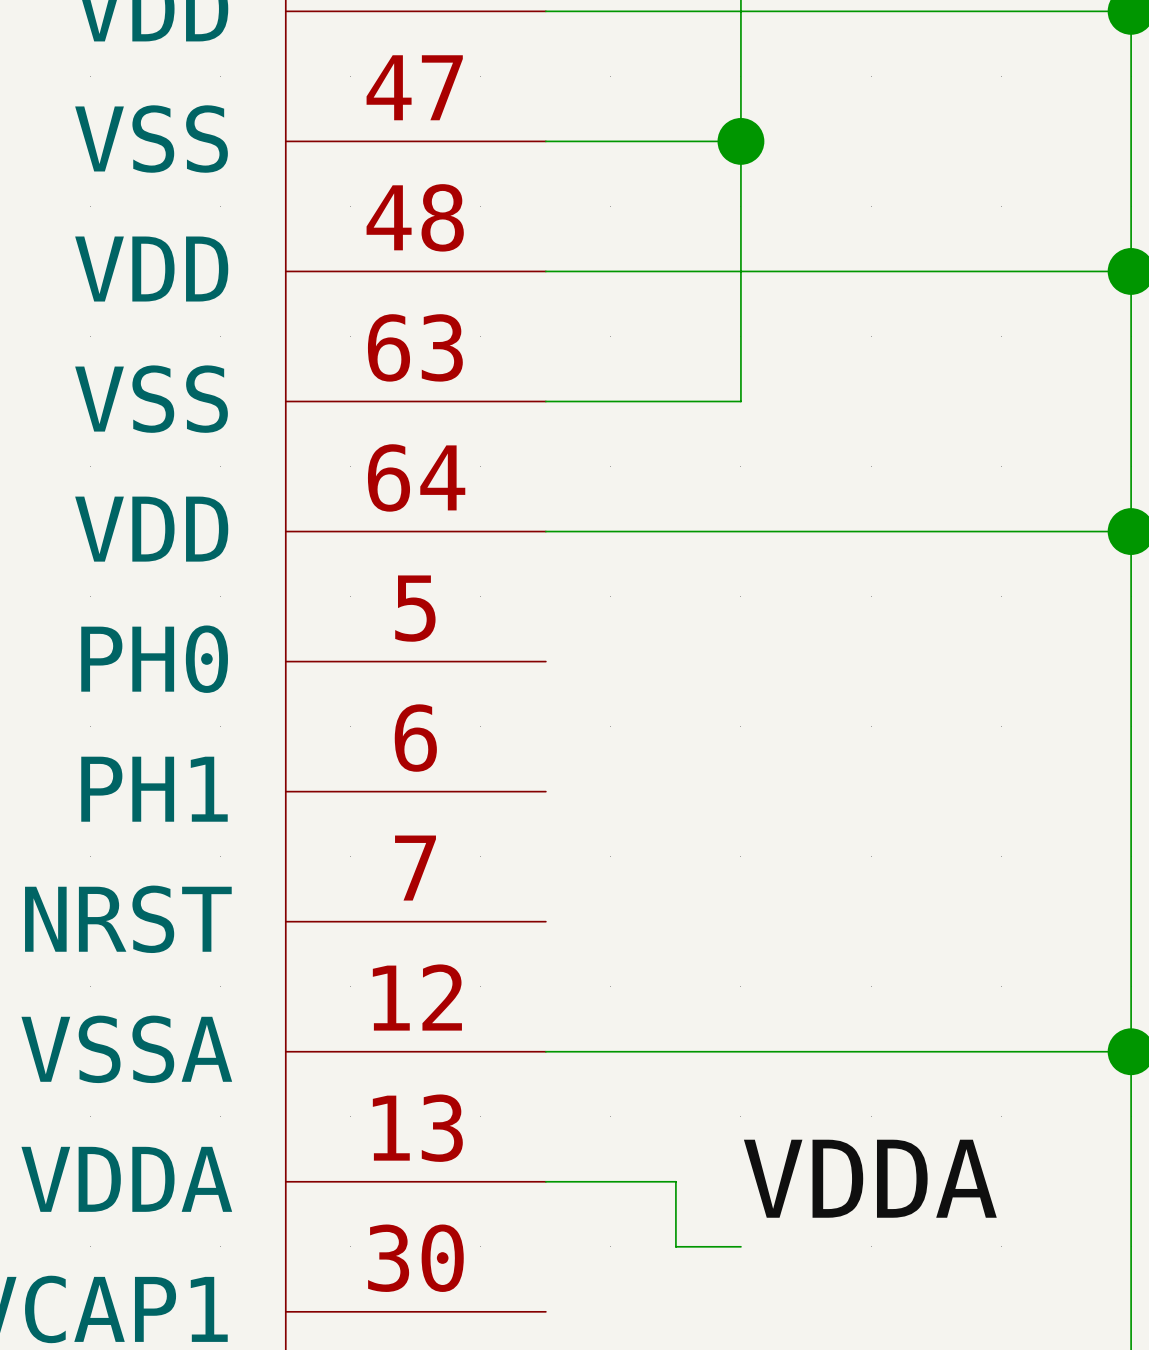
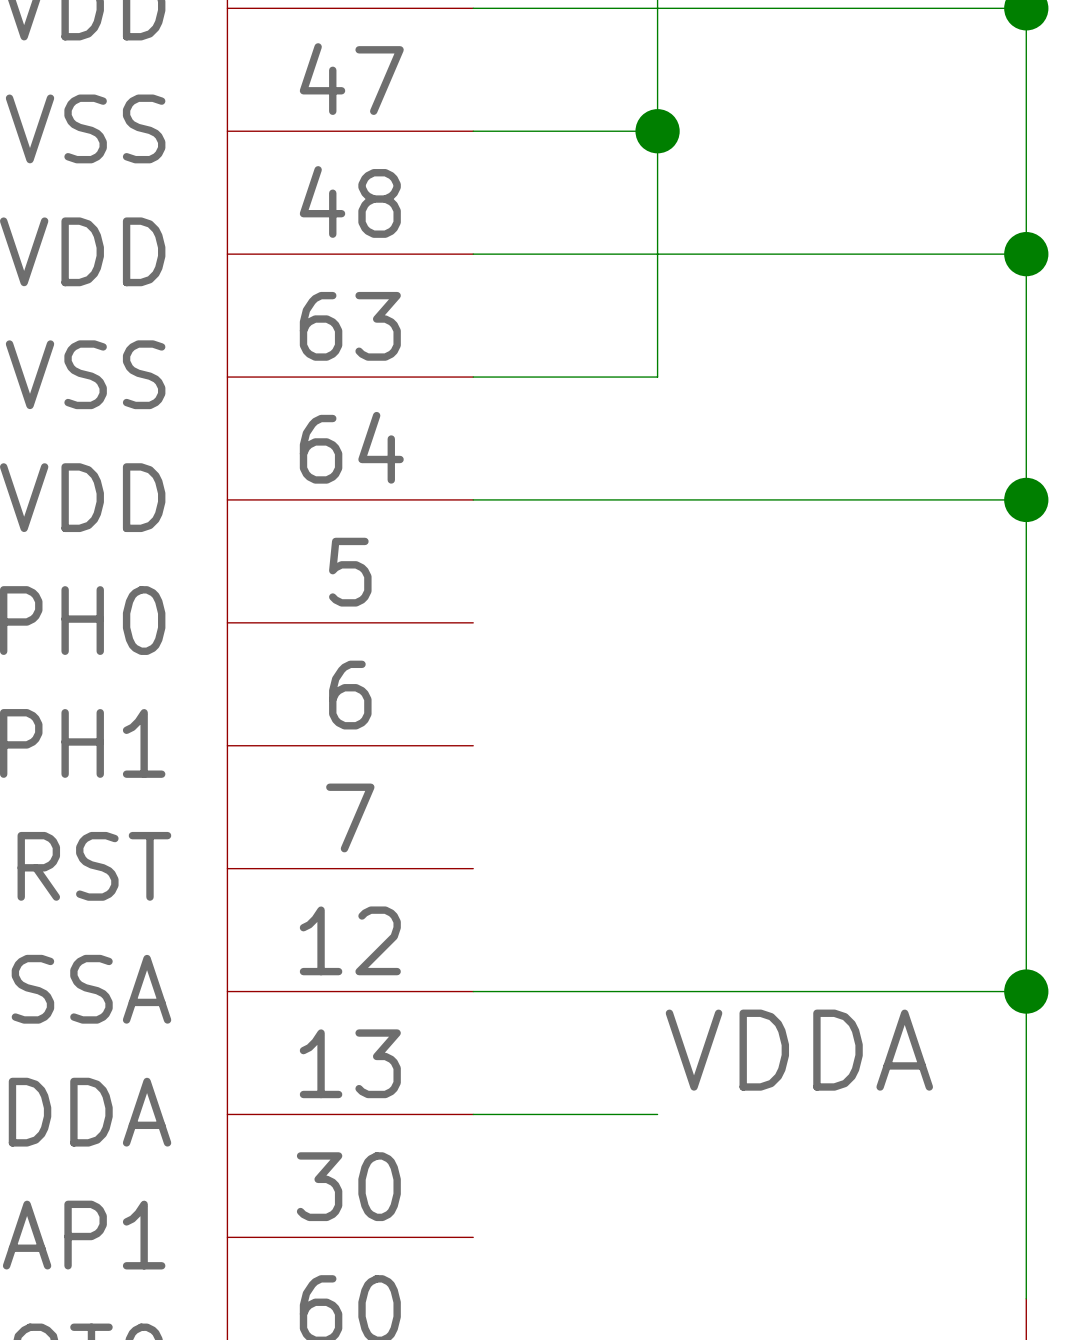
label position: VDDA (870, 1178) -> VDDA (799, 1050)
wire: (675, 1181) (675, 1246) (740, 1246) -> (596, 1114) (657, 1114)

